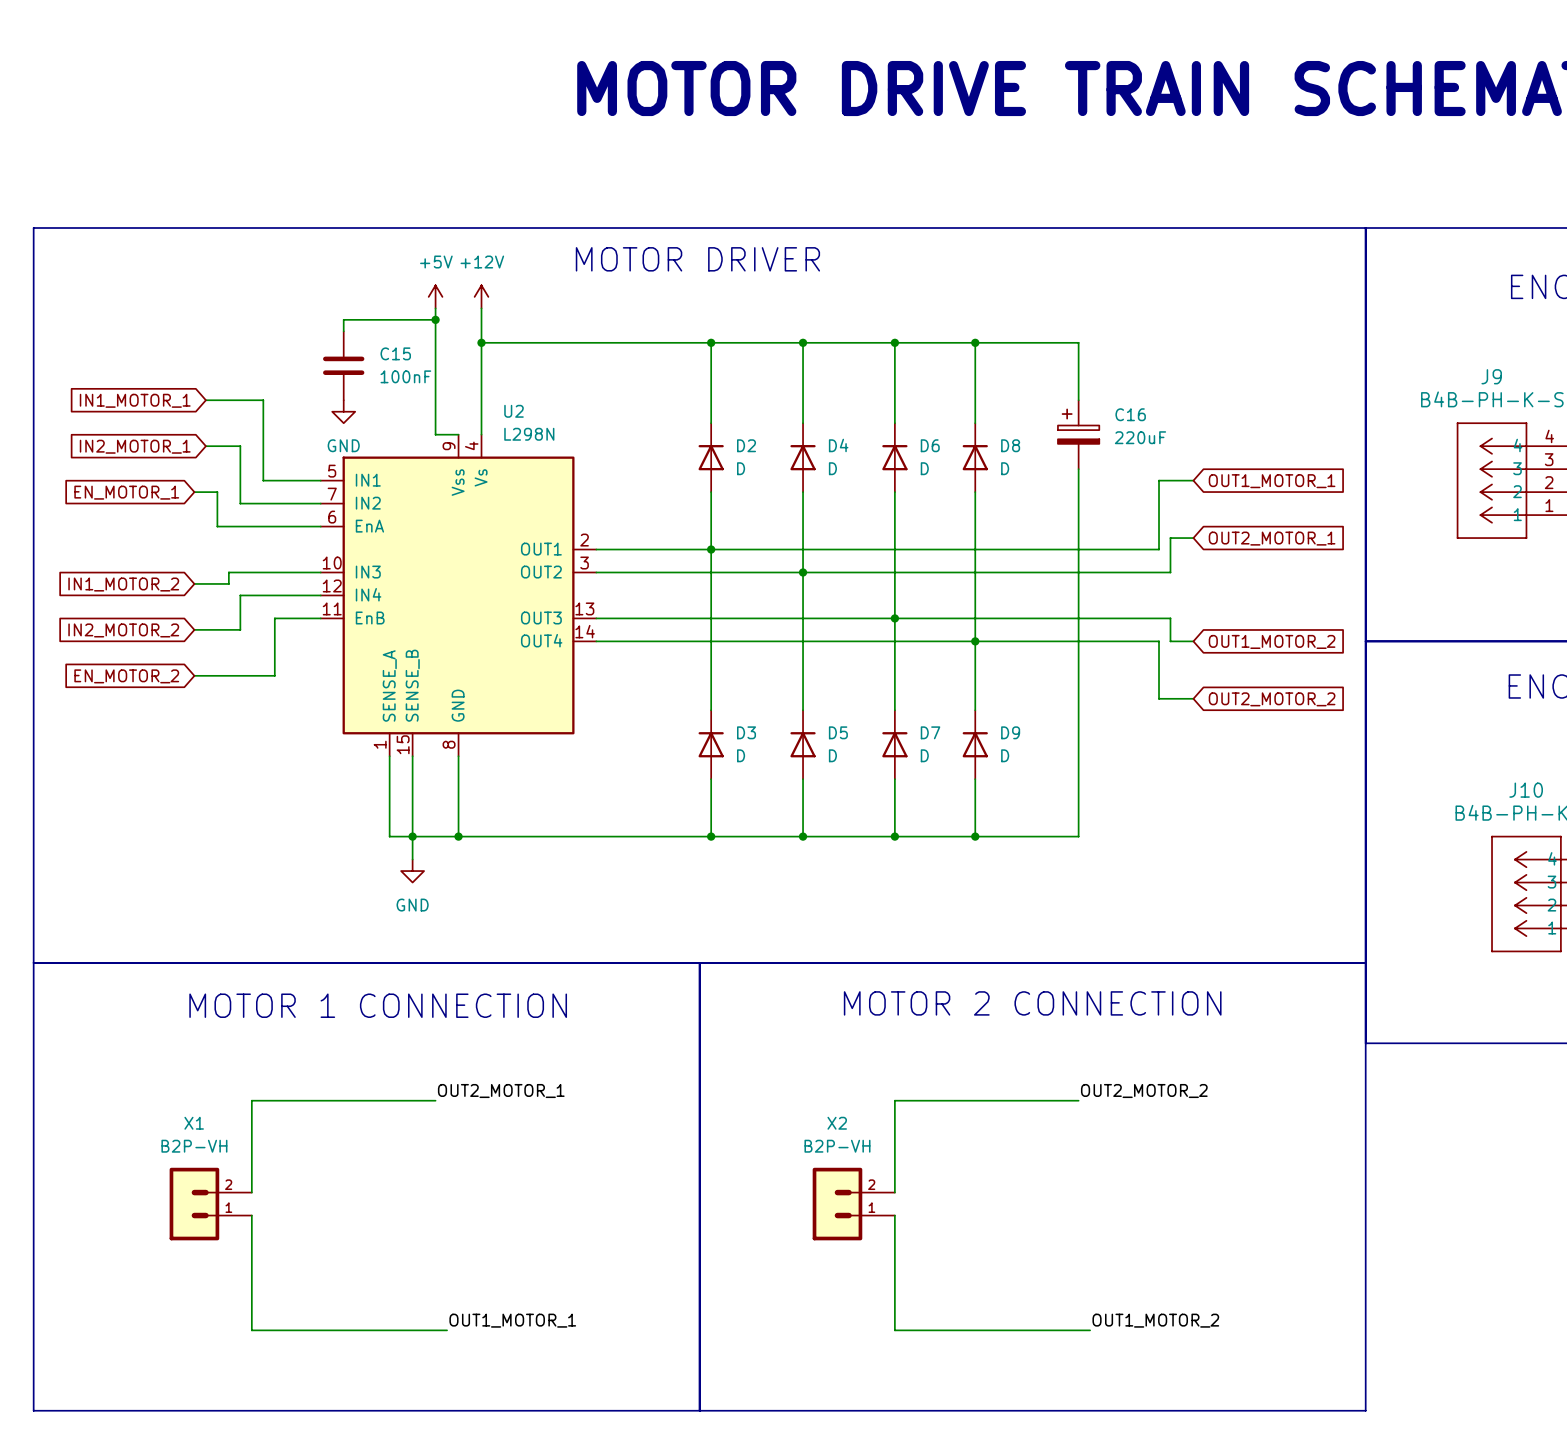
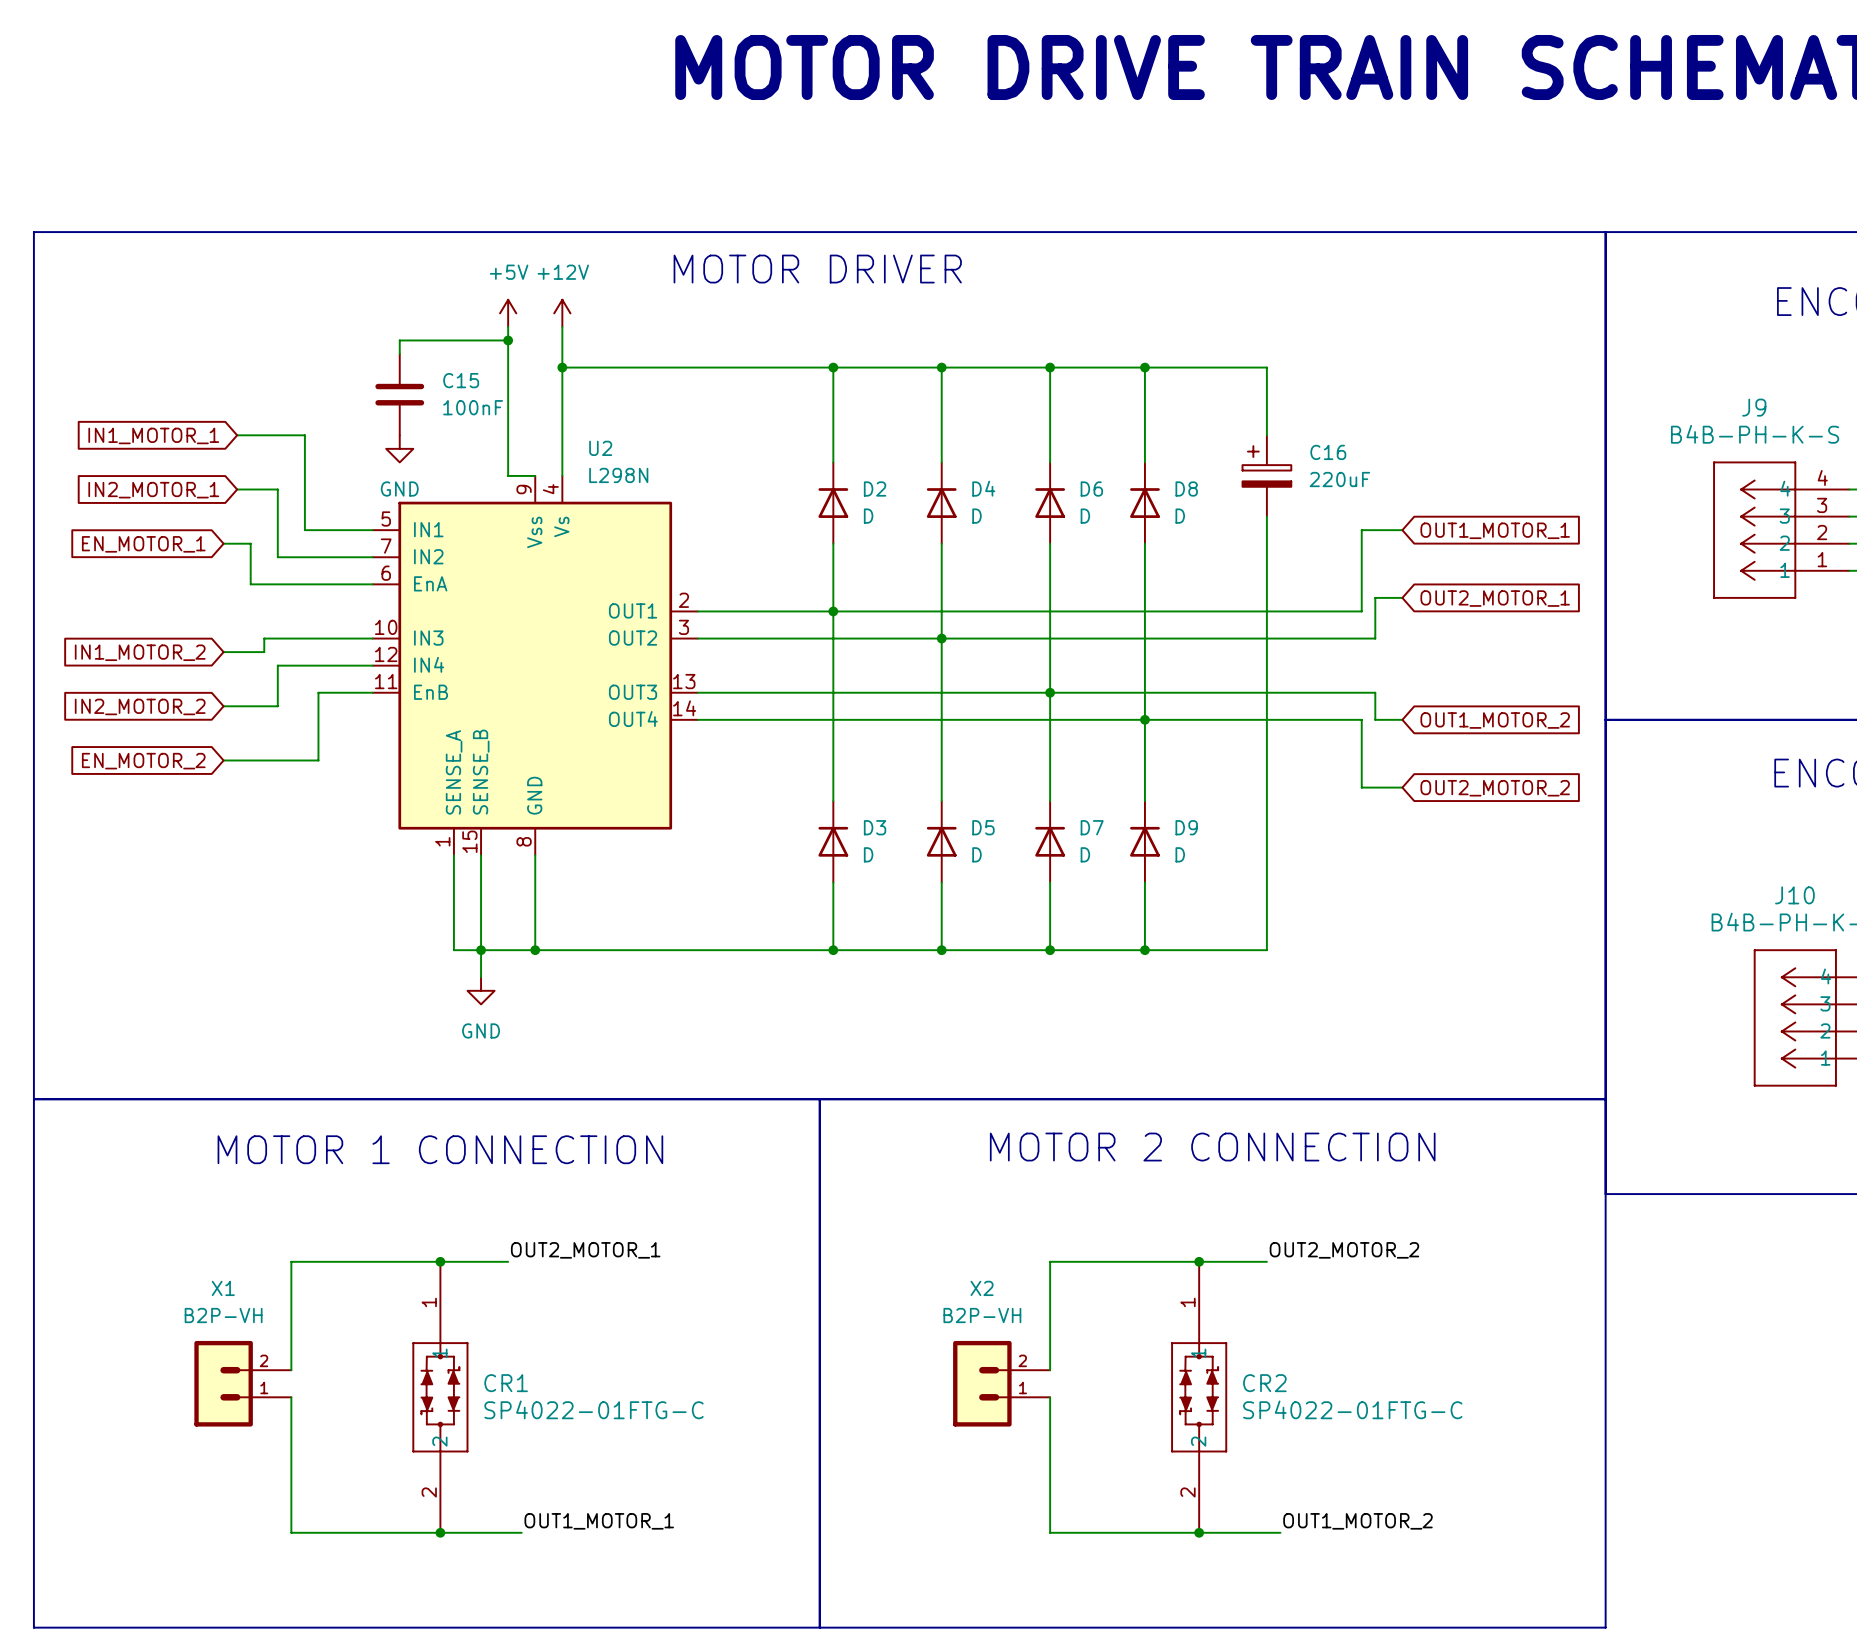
junction: none -> (440, 1261)
junction: none -> (1199, 1261)
CR1: none -> SP4022-01FTG-C (440, 1397)
CR2: none -> SP4022-01FTG-C (1199, 1397)
junction: none -> (440, 1532)
junction: none -> (1199, 1532)

